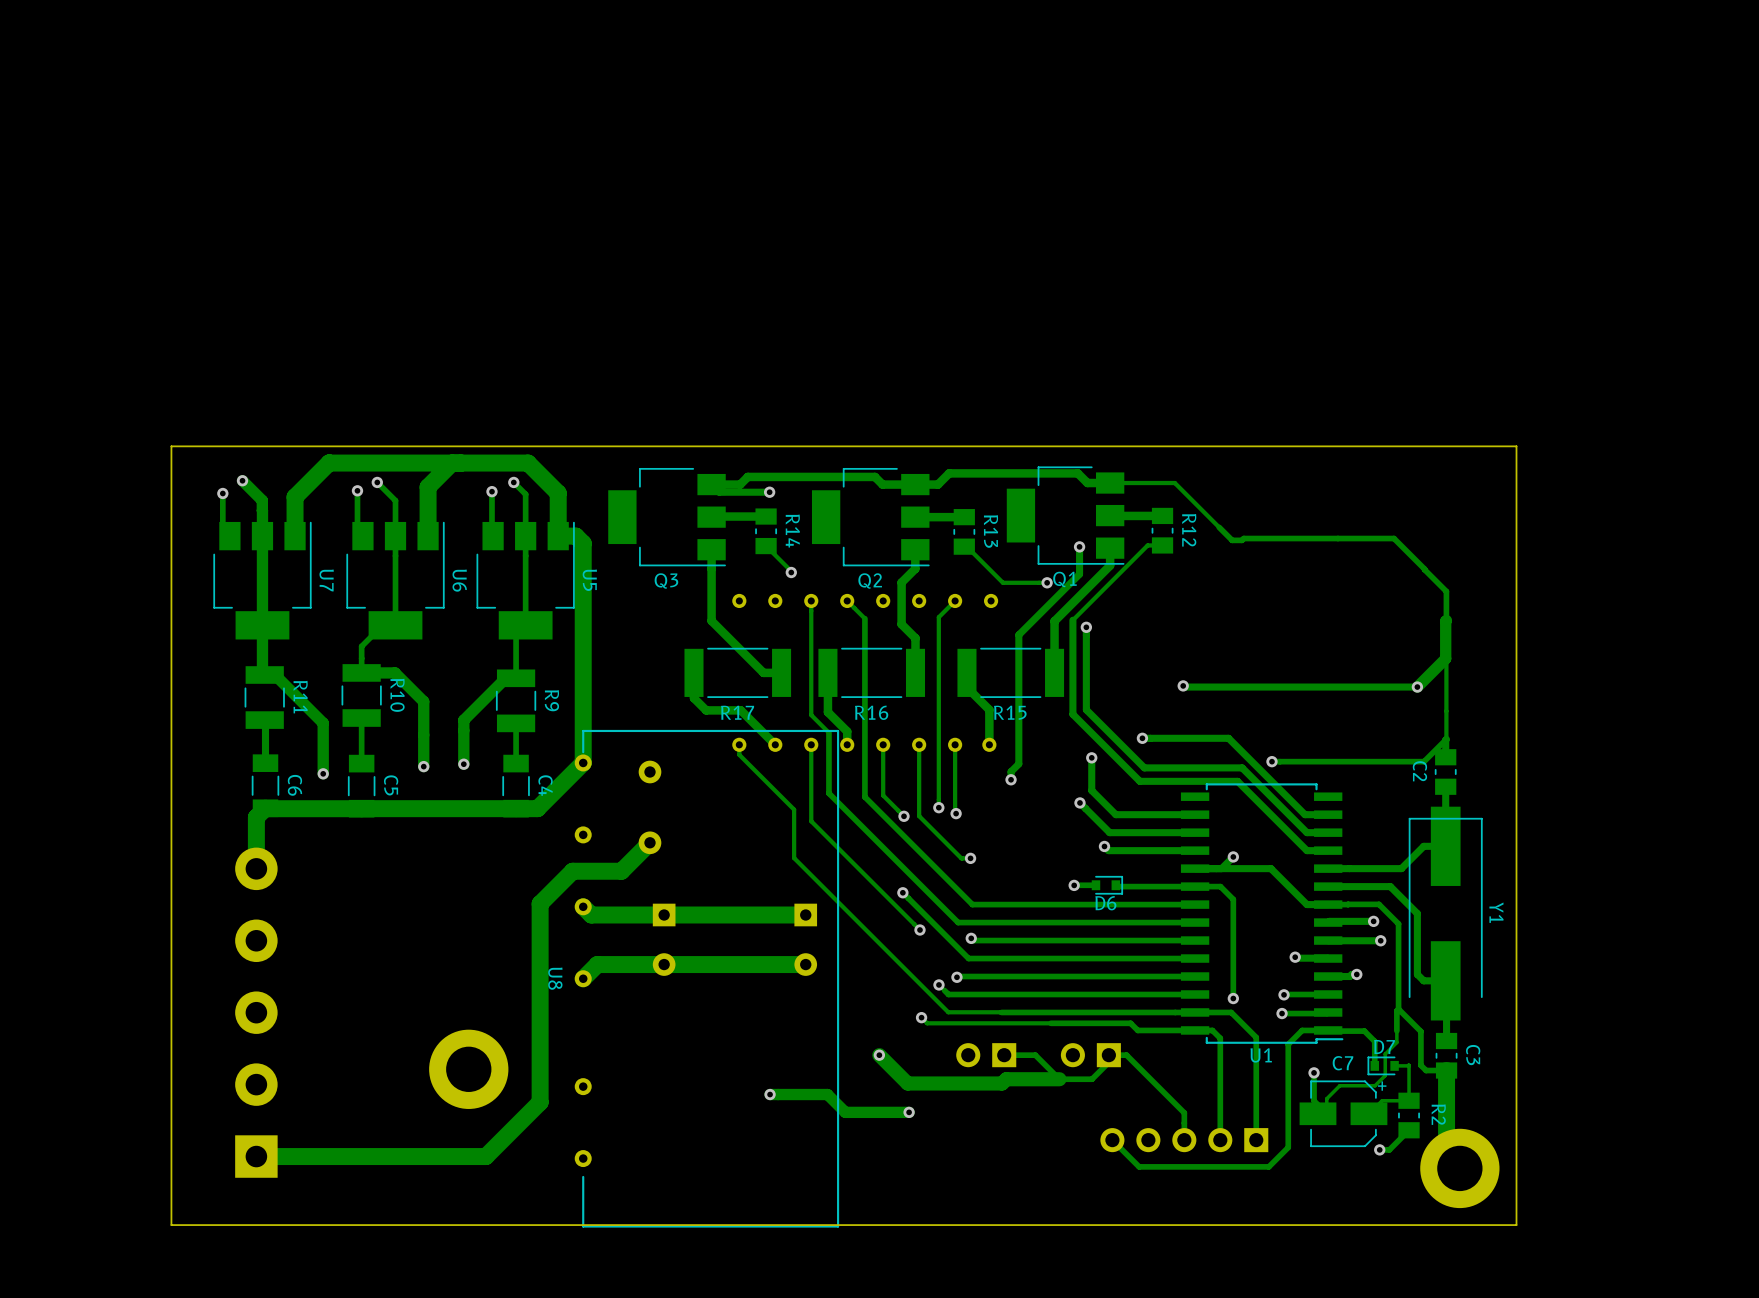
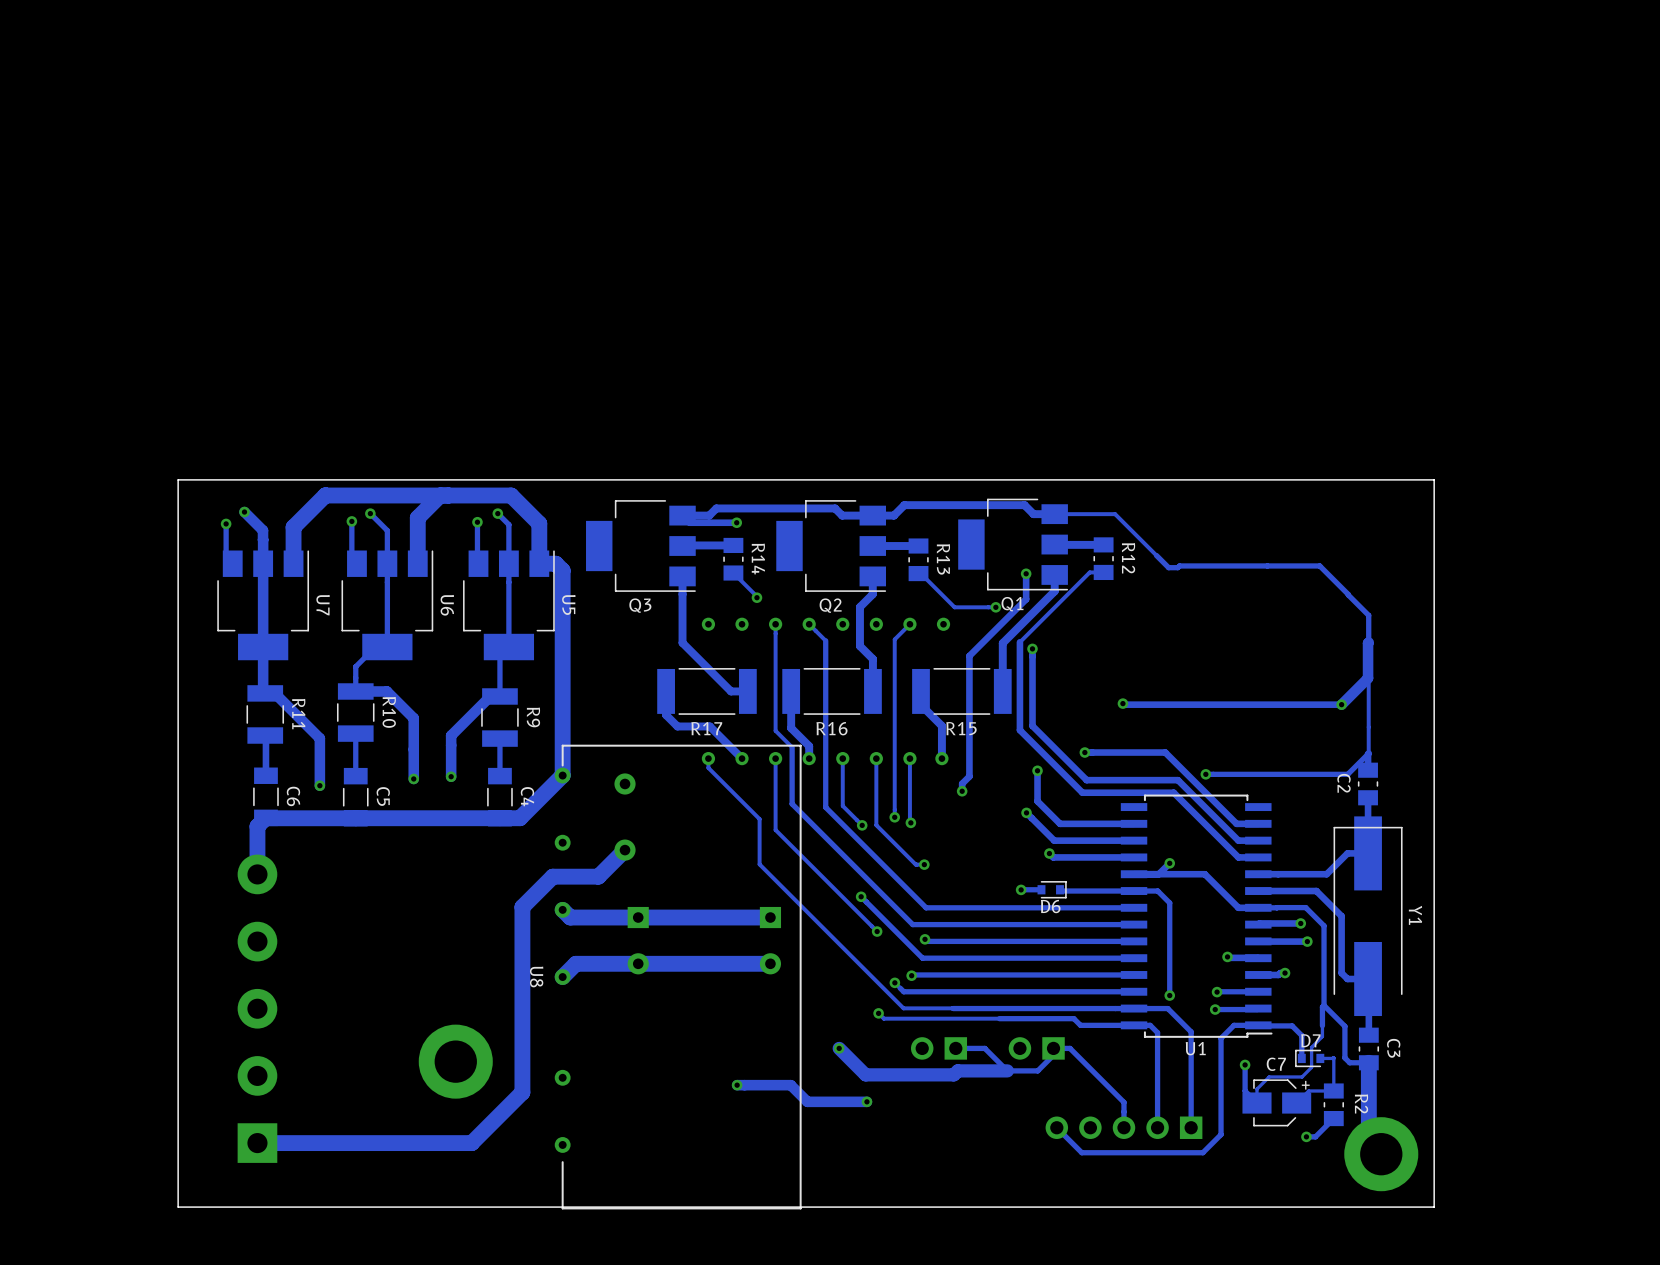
C7 footprint: [1299, 1080, 1388, 1148] -> [1242, 1079, 1312, 1127]

